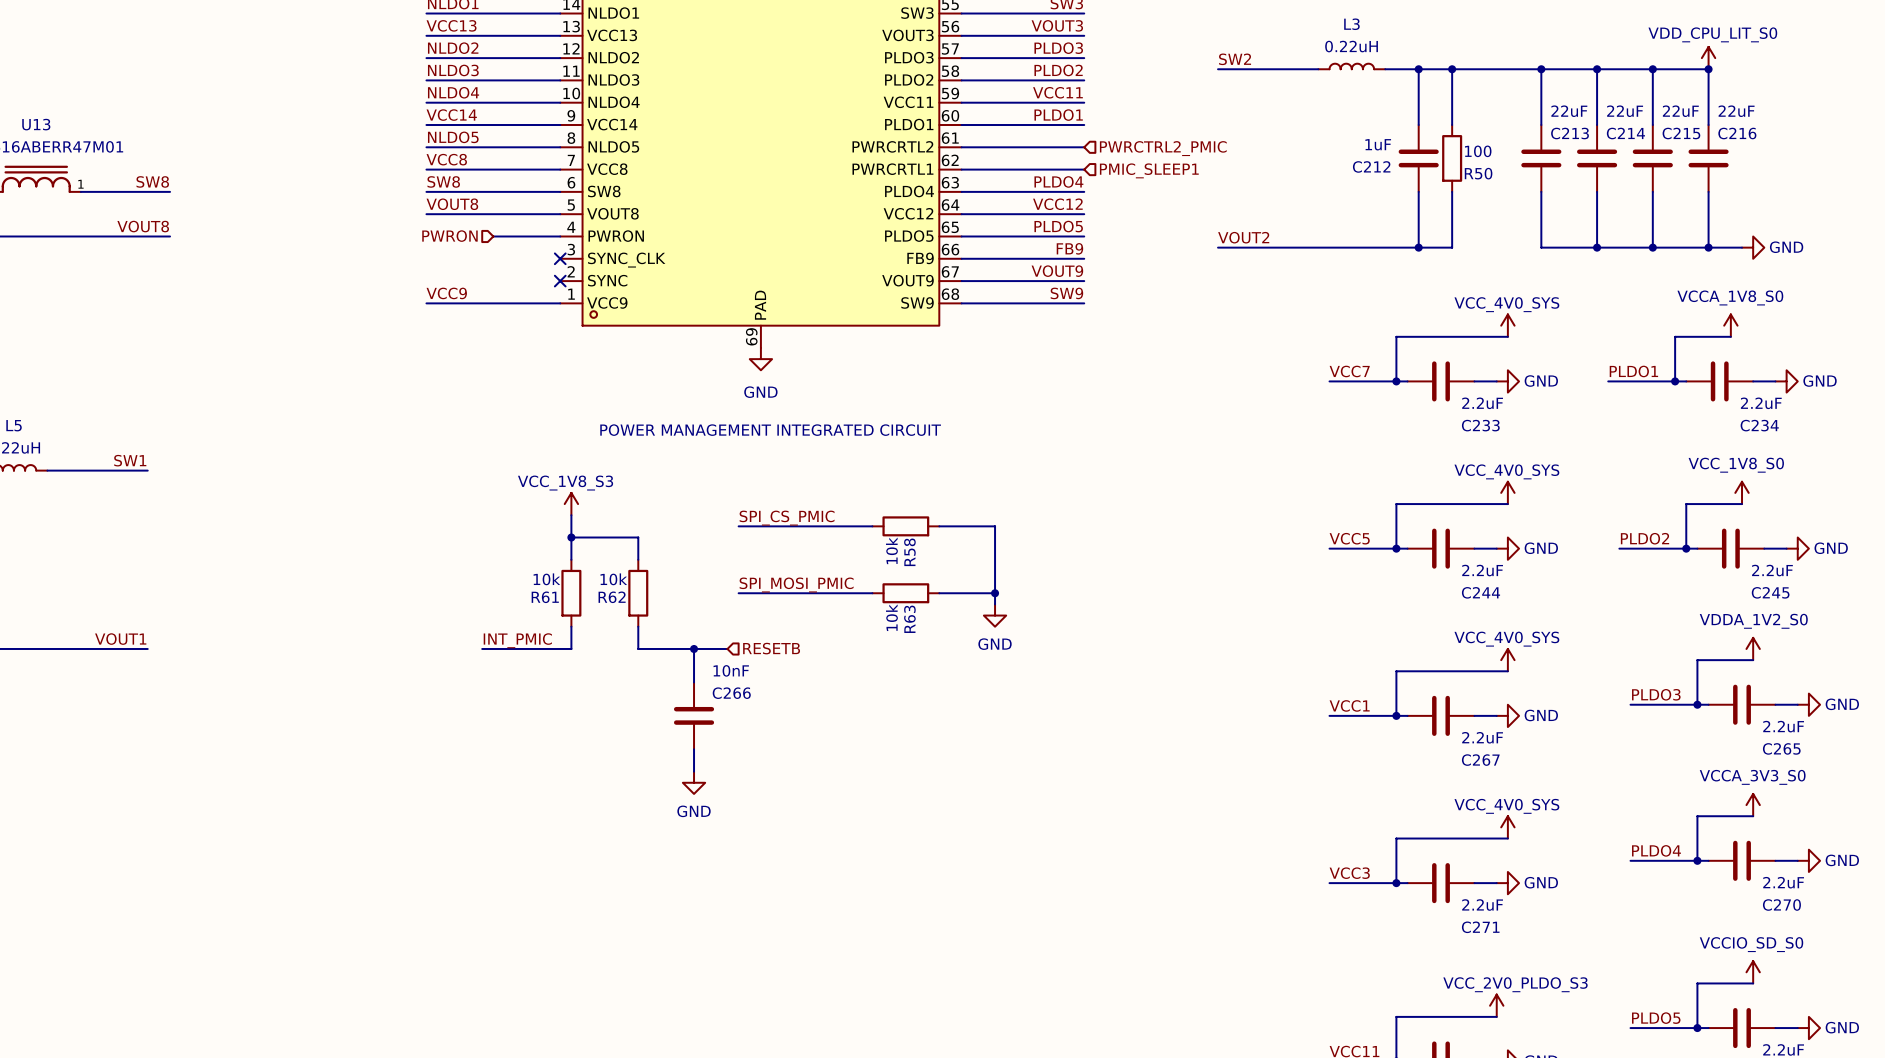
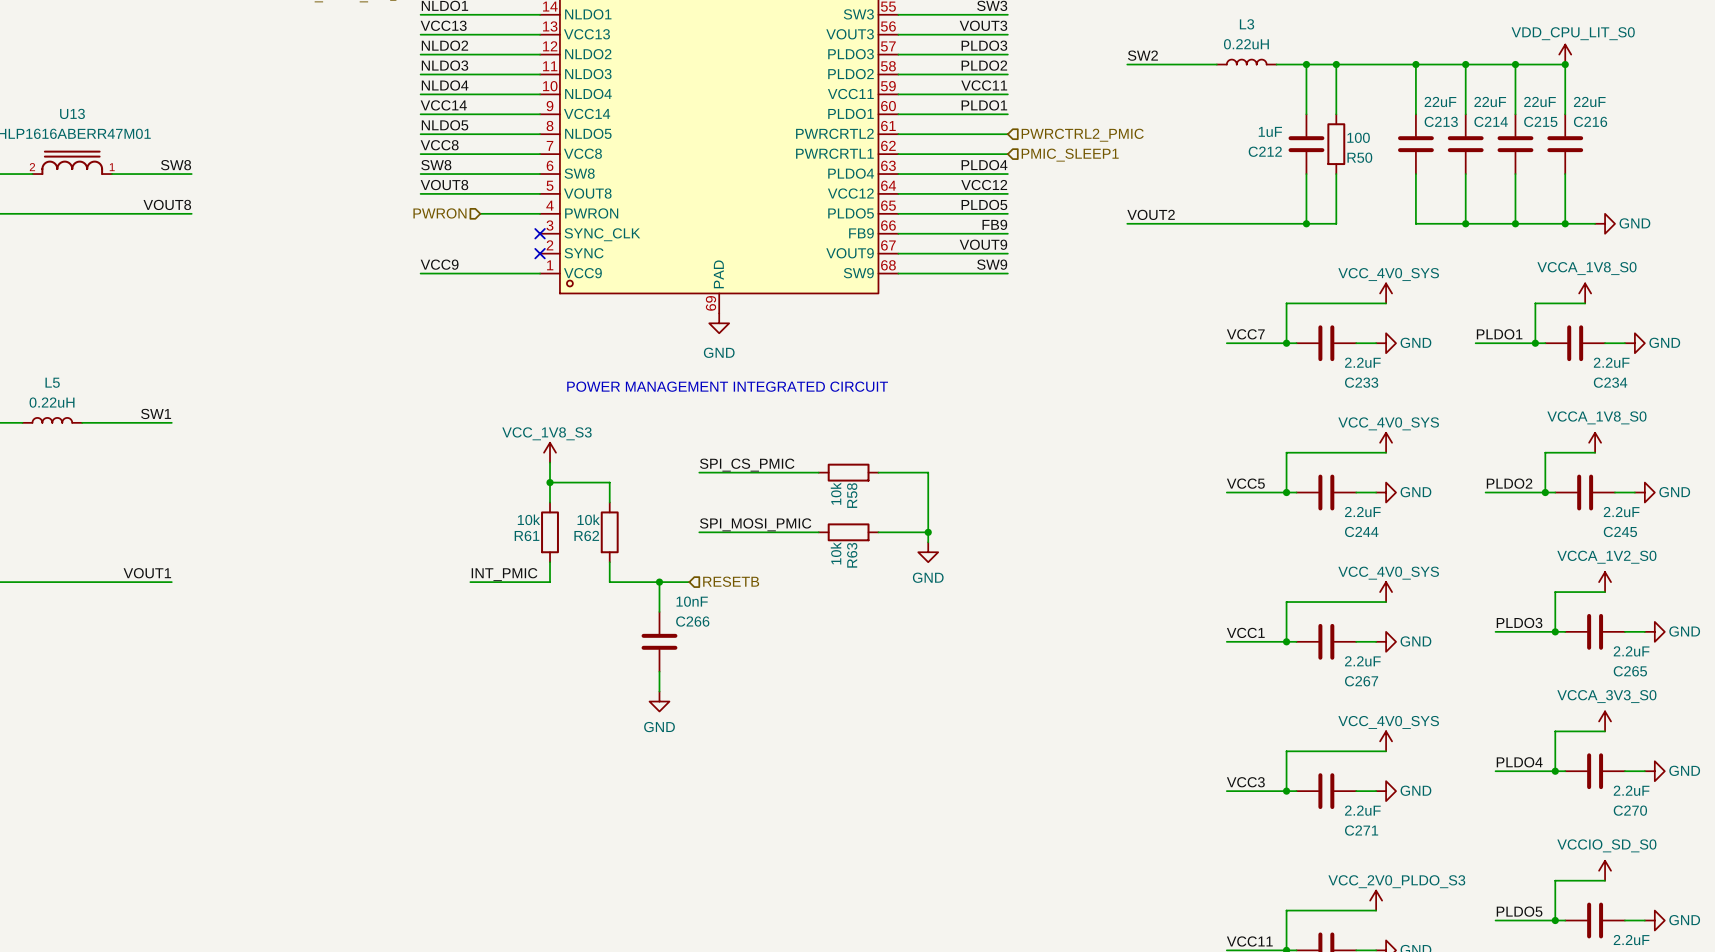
power symbol: VCC_1V8_S0 (1742, 492) -> VCCA_1V8_S0 (1595, 442)
power symbol: VDDA_1V2_S0 (1753, 648) -> VCCA_1V2_S0 (1605, 582)

